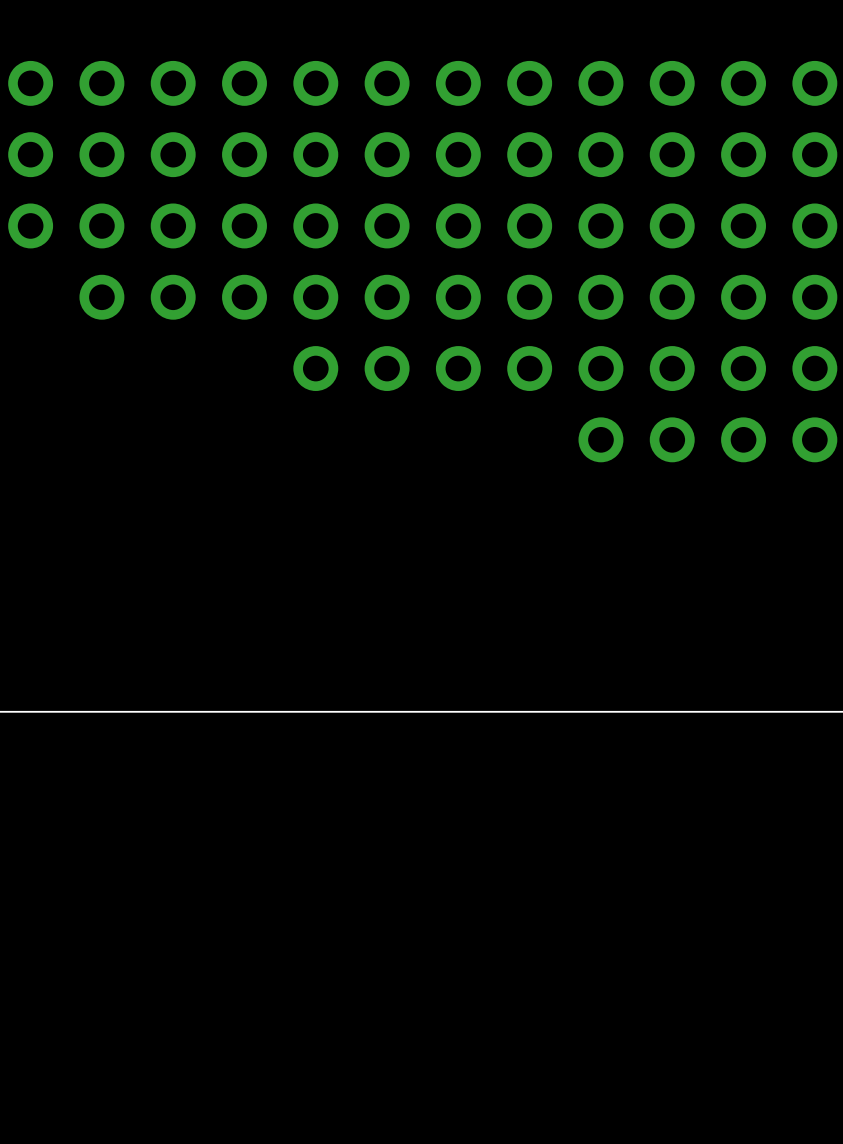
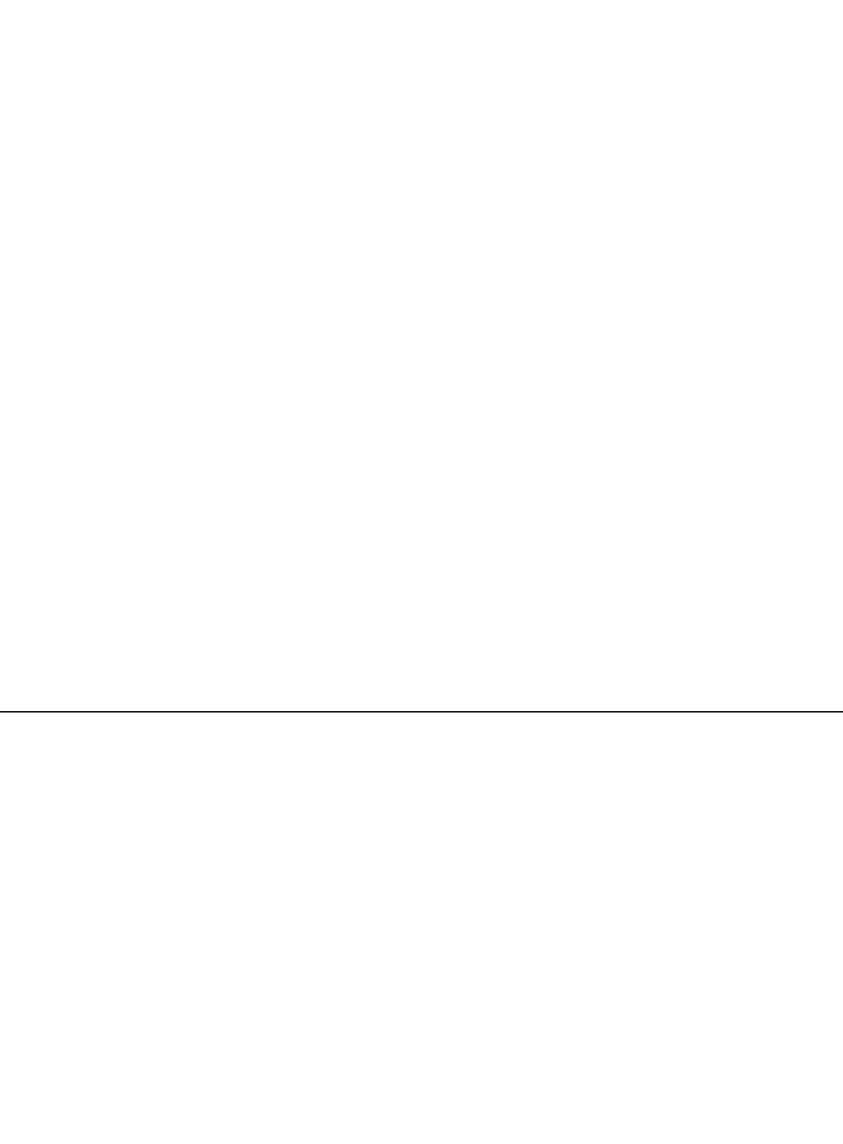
via: (30, 83) -> none
via: (101, 83) -> none
via: (173, 83) -> none
via: (244, 83) -> none
via: (315, 83) -> none
via: (387, 83) -> none
via: (458, 83) -> none
via: (529, 83) -> none
via: (600, 83) -> none
via: (672, 83) -> none
via: (743, 83) -> none
via: (814, 83) -> none
via: (30, 154) -> none
via: (101, 154) -> none
via: (173, 154) -> none
via: (244, 154) -> none
via: (315, 154) -> none
via: (387, 154) -> none
via: (458, 154) -> none
via: (529, 154) -> none
via: (600, 154) -> none
via: (672, 154) -> none
via: (743, 154) -> none
via: (814, 154) -> none
via: (30, 225) -> none
via: (101, 225) -> none
via: (173, 225) -> none
via: (244, 225) -> none
via: (315, 225) -> none
via: (387, 225) -> none
via: (458, 225) -> none
via: (529, 225) -> none
via: (600, 225) -> none
via: (672, 225) -> none
via: (743, 225) -> none
via: (814, 225) -> none
via: (101, 297) -> none
via: (173, 297) -> none
via: (244, 297) -> none
via: (315, 297) -> none
via: (387, 297) -> none
via: (458, 297) -> none
via: (529, 297) -> none
via: (600, 297) -> none
via: (672, 297) -> none
via: (743, 297) -> none
via: (814, 297) -> none
via: (315, 368) -> none
via: (387, 368) -> none
via: (458, 368) -> none
via: (529, 368) -> none
via: (600, 368) -> none
via: (672, 368) -> none
via: (743, 368) -> none
via: (814, 368) -> none
via: (600, 439) -> none
via: (672, 439) -> none
via: (743, 439) -> none
via: (814, 439) -> none

